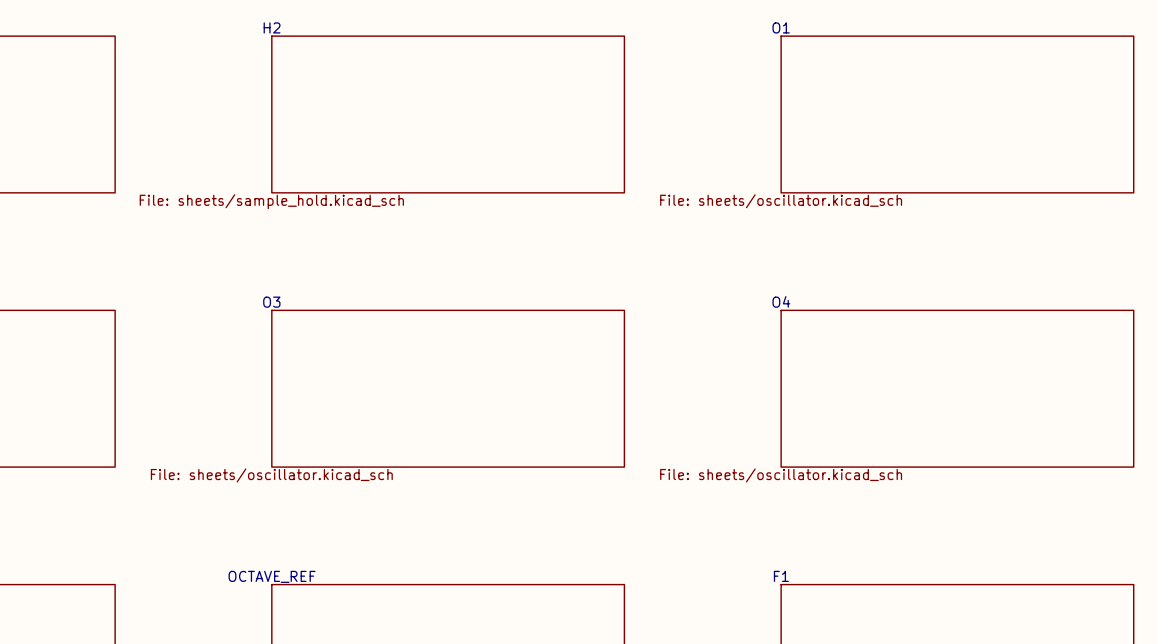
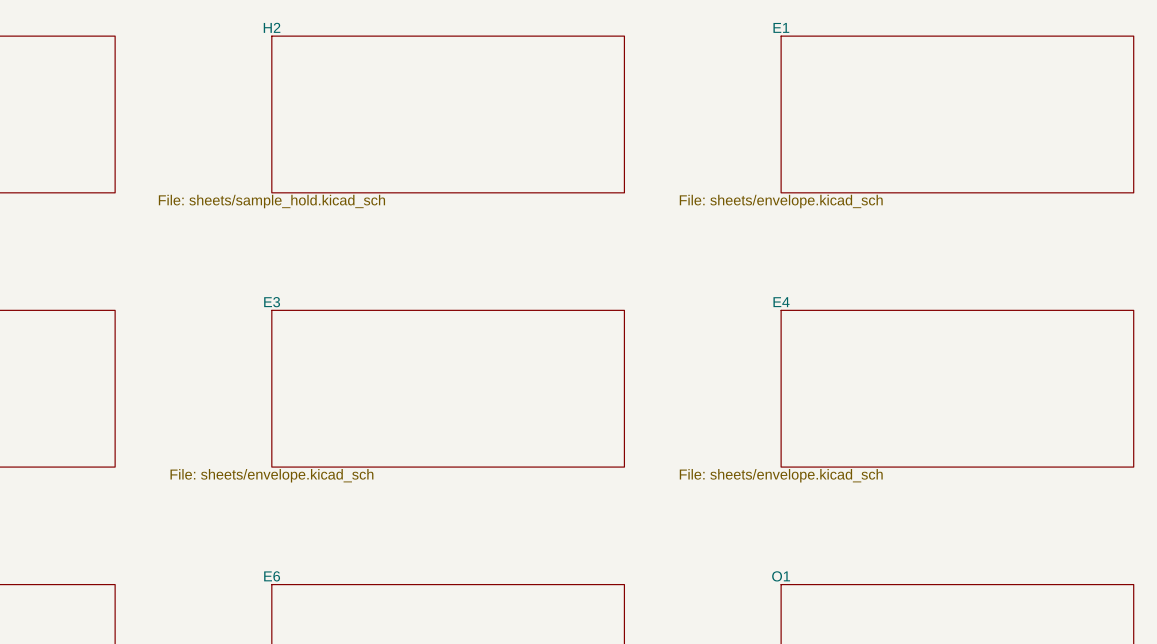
sheet O1 name: O1 (781, 27) -> E1 (781, 27)
sheet O1 value: File: sheets/oscillator.kicad_sch (781, 201) -> File: sheets/envelope.kicad_sch (781, 201)
sheet O4 name: O4 (781, 301) -> E4 (781, 302)
sheet O3 name: O3 (271, 302) -> E3 (272, 302)
sheet O3 value: File: sheets/oscillator.kicad_sch (271, 475) -> File: sheets/envelope.kicad_sch (271, 475)
sheet O4 value: File: sheets/oscillator.kicad_sch (781, 475) -> File: sheets/envelope.kicad_sch (781, 475)
sheet OCTAVE_REF name: OCTAVE_REF (272, 576) -> E6 (272, 576)
sheet F1 name: F1 (781, 576) -> O1 (781, 576)

